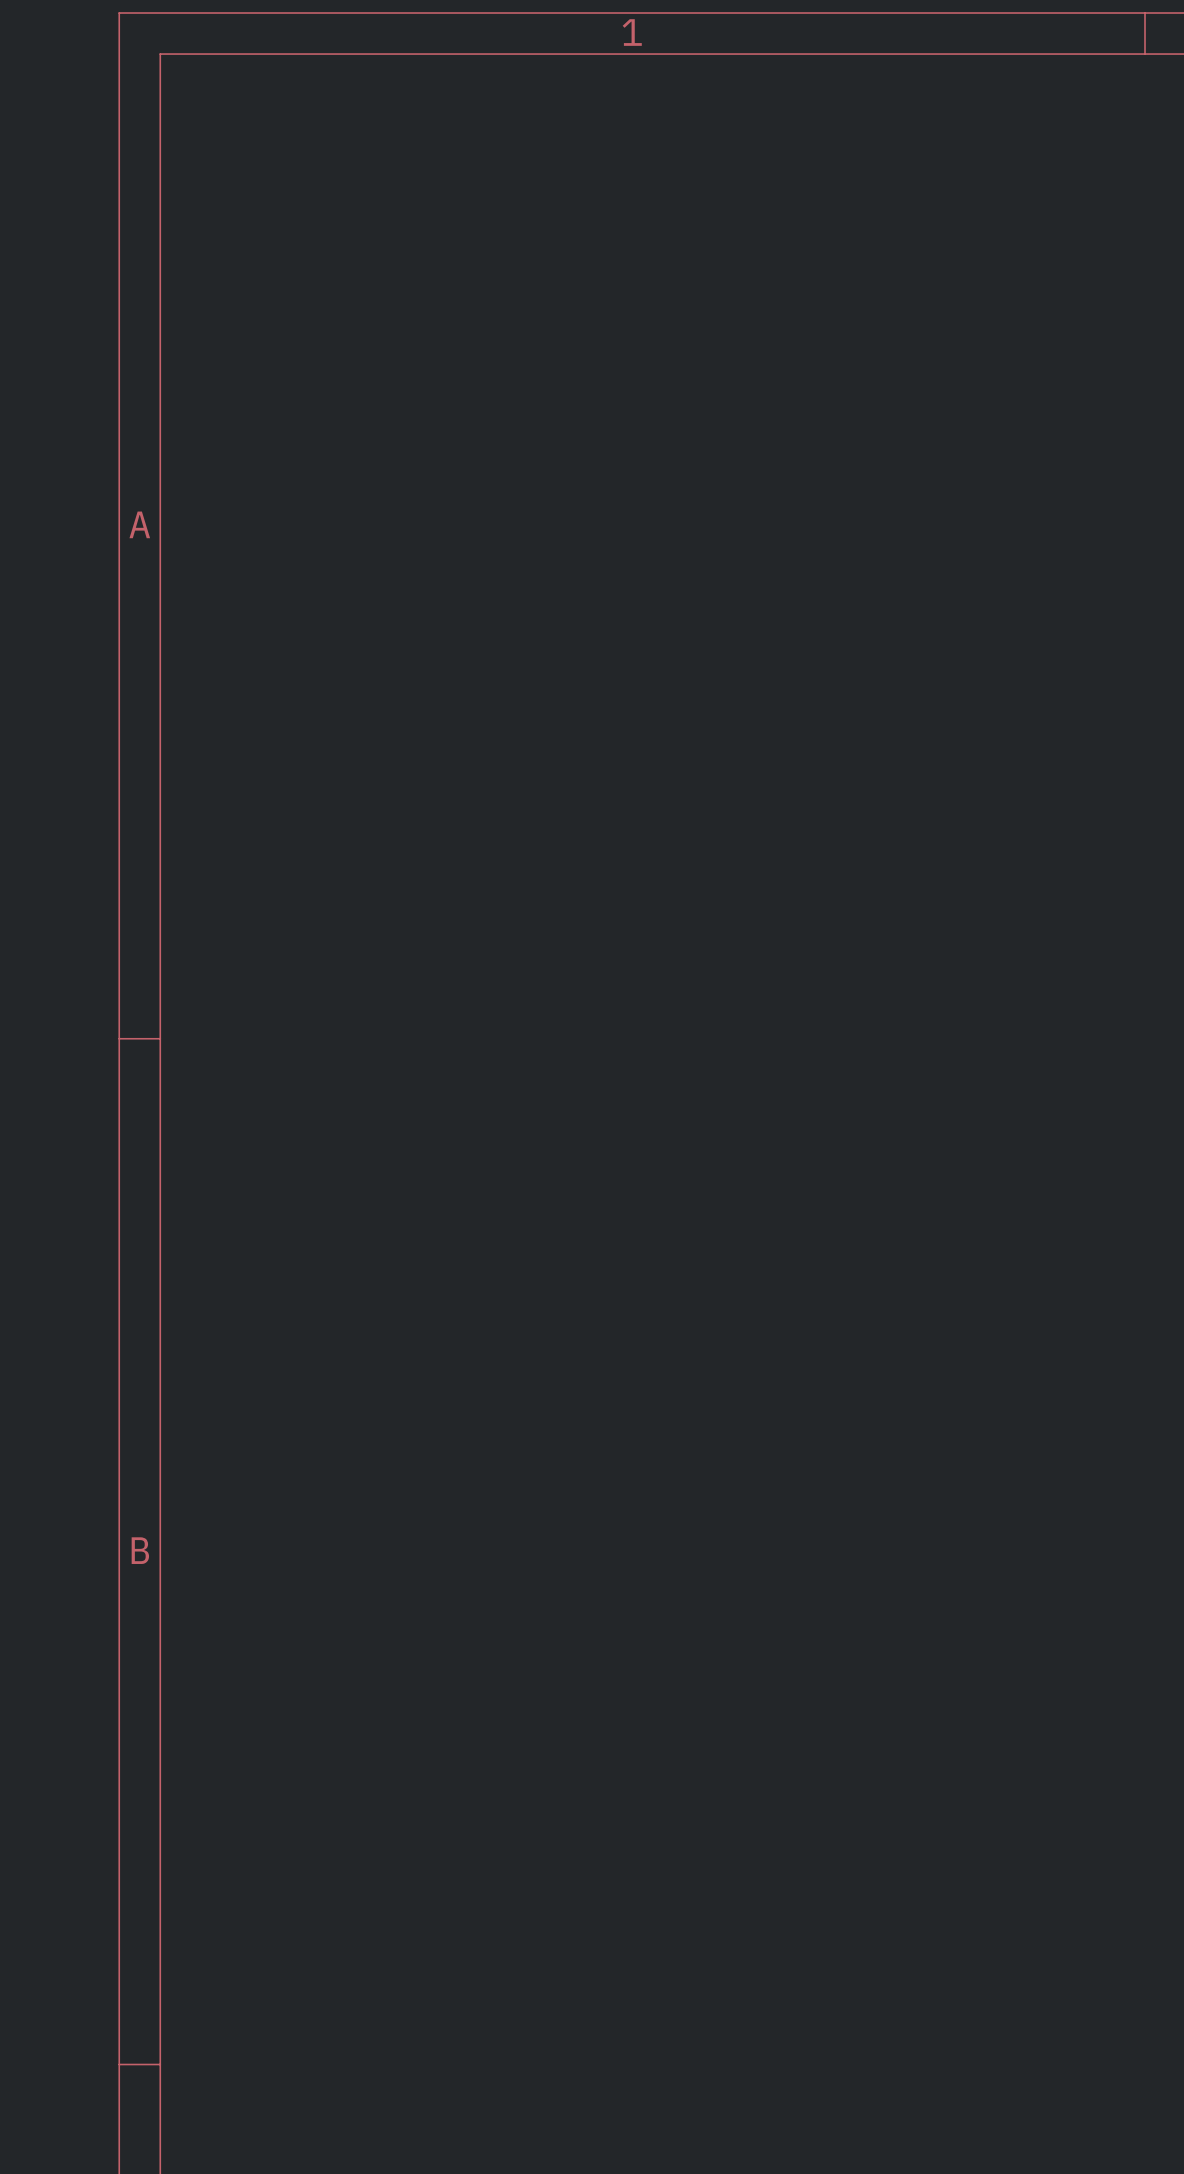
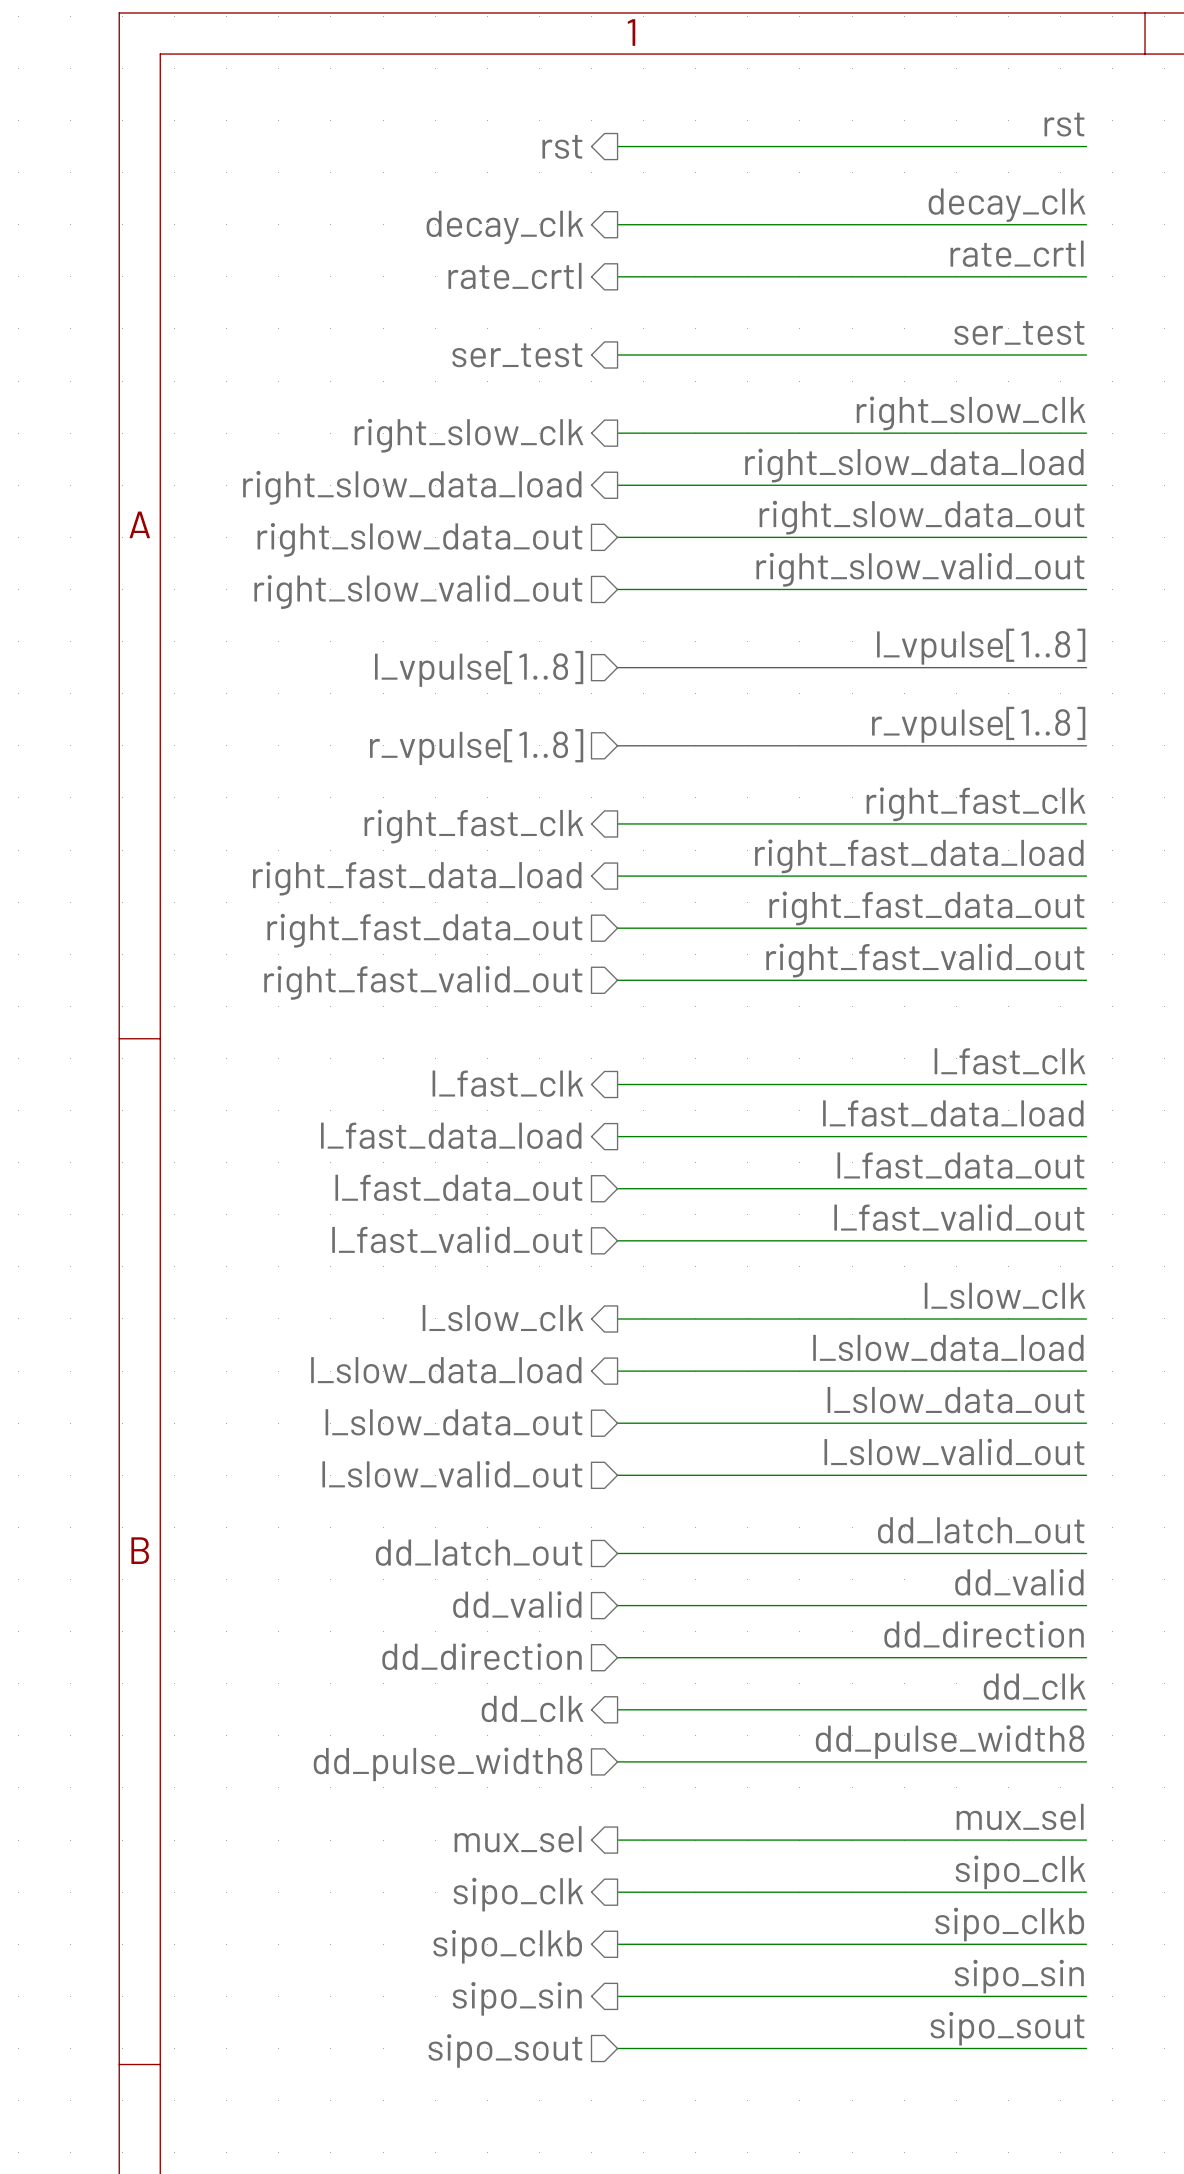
label: none -> rst (1064, 124)
hierarchical label: none -> rst (562, 146)
wire: none -> (617, 146) (1086, 146)
label: none -> decay_clk (1007, 205)
wire: none -> (617, 224) (1086, 224)
hierarchical label: none -> decay_clk (504, 227)
label: none -> rate_crtl (1017, 253)
wire: none -> (617, 276) (1086, 276)
hierarchical label: none -> rate_crtl (515, 276)
label: none -> ser_test (1019, 333)
wire: none -> (617, 354) (1086, 354)
hierarchical label: none -> ser_test (517, 355)
label: none -> right_slow_clk (971, 413)
wire: none -> (617, 433) (1086, 433)
hierarchical label: none -> right_slow_clk (469, 435)
label: none -> right_slow_data_load (914, 465)
wire: none -> (617, 485) (1086, 485)
hierarchical label: none -> right_slow_data_load (412, 487)
label: none -> right_slow_data_out (922, 517)
wire: none -> (617, 537) (1086, 537)
hierarchical label: none -> right_slow_data_out (419, 539)
label: none -> right_slow_valid_out (920, 569)
wire: none -> (617, 589) (1086, 589)
hierarchical label: none -> right_slow_valid_out (418, 592)
label: none -> l_vpulse[1..8] (981, 646)
bus: none -> (617, 667) (1086, 667)
hierarchical label: none -> l_vpulse[1..8] (479, 668)
label: none -> r_vpulse[1..8] (978, 724)
bus: none -> (617, 745) (1086, 745)
hierarchical label: none -> r_vpulse[1..8] (476, 747)
label: none -> right_fast_clk (976, 804)
wire: none -> (617, 823) (1086, 823)
hierarchical label: none -> right_fast_clk (473, 826)
label: none -> right_fast_data_load (919, 856)
wire: none -> (617, 876) (1086, 876)
hierarchical label: none -> right_fast_data_load (417, 878)
label: none -> right_fast_data_out (926, 908)
wire: none -> (617, 928) (1086, 928)
hierarchical label: none -> right_fast_data_out (424, 930)
label: none -> right_fast_valid_out (925, 960)
wire: none -> (617, 980) (1086, 980)
hierarchical label: none -> right_fast_valid_out (423, 982)
label: none -> l_fast_clk (1010, 1061)
wire: none -> (617, 1084) (1086, 1084)
hierarchical label: none -> l_fast_clk (507, 1083)
label: none -> l_fast_data_load (953, 1113)
wire: none -> (617, 1136) (1086, 1136)
hierarchical label: none -> l_fast_data_load (451, 1135)
label: none -> l_fast_data_out (960, 1165)
wire: none -> (617, 1188) (1086, 1188)
hierarchical label: none -> l_fast_data_out (458, 1187)
label: none -> l_fast_valid_out (959, 1217)
wire: none -> (617, 1240) (1086, 1240)
hierarchical label: none -> l_fast_valid_out (457, 1239)
label: none -> l_slow_clk (1005, 1295)
wire: none -> (617, 1318) (1086, 1318)
hierarchical label: none -> l_slow_clk (503, 1318)
label: none -> l_slow_data_load (948, 1348)
wire: none -> (617, 1371) (1086, 1371)
hierarchical label: none -> l_slow_data_load (446, 1370)
label: none -> l_slow_data_out (956, 1400)
wire: none -> (617, 1423) (1086, 1423)
hierarchical label: none -> l_slow_data_out (453, 1422)
label: none -> l_slow_valid_out (954, 1452)
wire: none -> (617, 1475) (1086, 1475)
hierarchical label: none -> l_slow_valid_out (452, 1474)
label: none -> dd_latch_out (981, 1530)
wire: none -> (617, 1553) (1086, 1553)
hierarchical label: none -> dd_latch_out (479, 1552)
label: none -> dd_valid (1019, 1582)
wire: none -> (617, 1605) (1086, 1605)
hierarchical label: none -> dd_valid (517, 1604)
label: none -> dd_direction (984, 1634)
wire: none -> (617, 1657) (1086, 1657)
hierarchical label: none -> dd_direction (482, 1656)
label: none -> dd_clk (1034, 1686)
wire: none -> (617, 1709) (1086, 1709)
hierarchical label: none -> dd_clk (532, 1708)
label: none -> dd_pulse_width8 (950, 1742)
wire: none -> (617, 1761) (1086, 1761)
hierarchical label: none -> dd_pulse_width8 (447, 1764)
label: none -> mux_sel (1020, 1816)
wire: none -> (617, 1840) (1086, 1840)
hierarchical label: none -> mux_sel (518, 1839)
label: none -> sipo_clk (1020, 1872)
wire: none -> (617, 1892) (1086, 1892)
hierarchical label: none -> sipo_clk (518, 1894)
label: none -> sipo_clkb (1009, 1924)
wire: none -> (617, 1944) (1086, 1944)
hierarchical label: none -> sipo_clkb (507, 1946)
label: none -> sipo_sin (1019, 1976)
wire: none -> (617, 1996) (1086, 1996)
hierarchical label: none -> sipo_sin (517, 1998)
label: none -> sipo_sout (1007, 2028)
wire: none -> (617, 2048) (1086, 2048)
hierarchical label: none -> sipo_sout (505, 2050)

